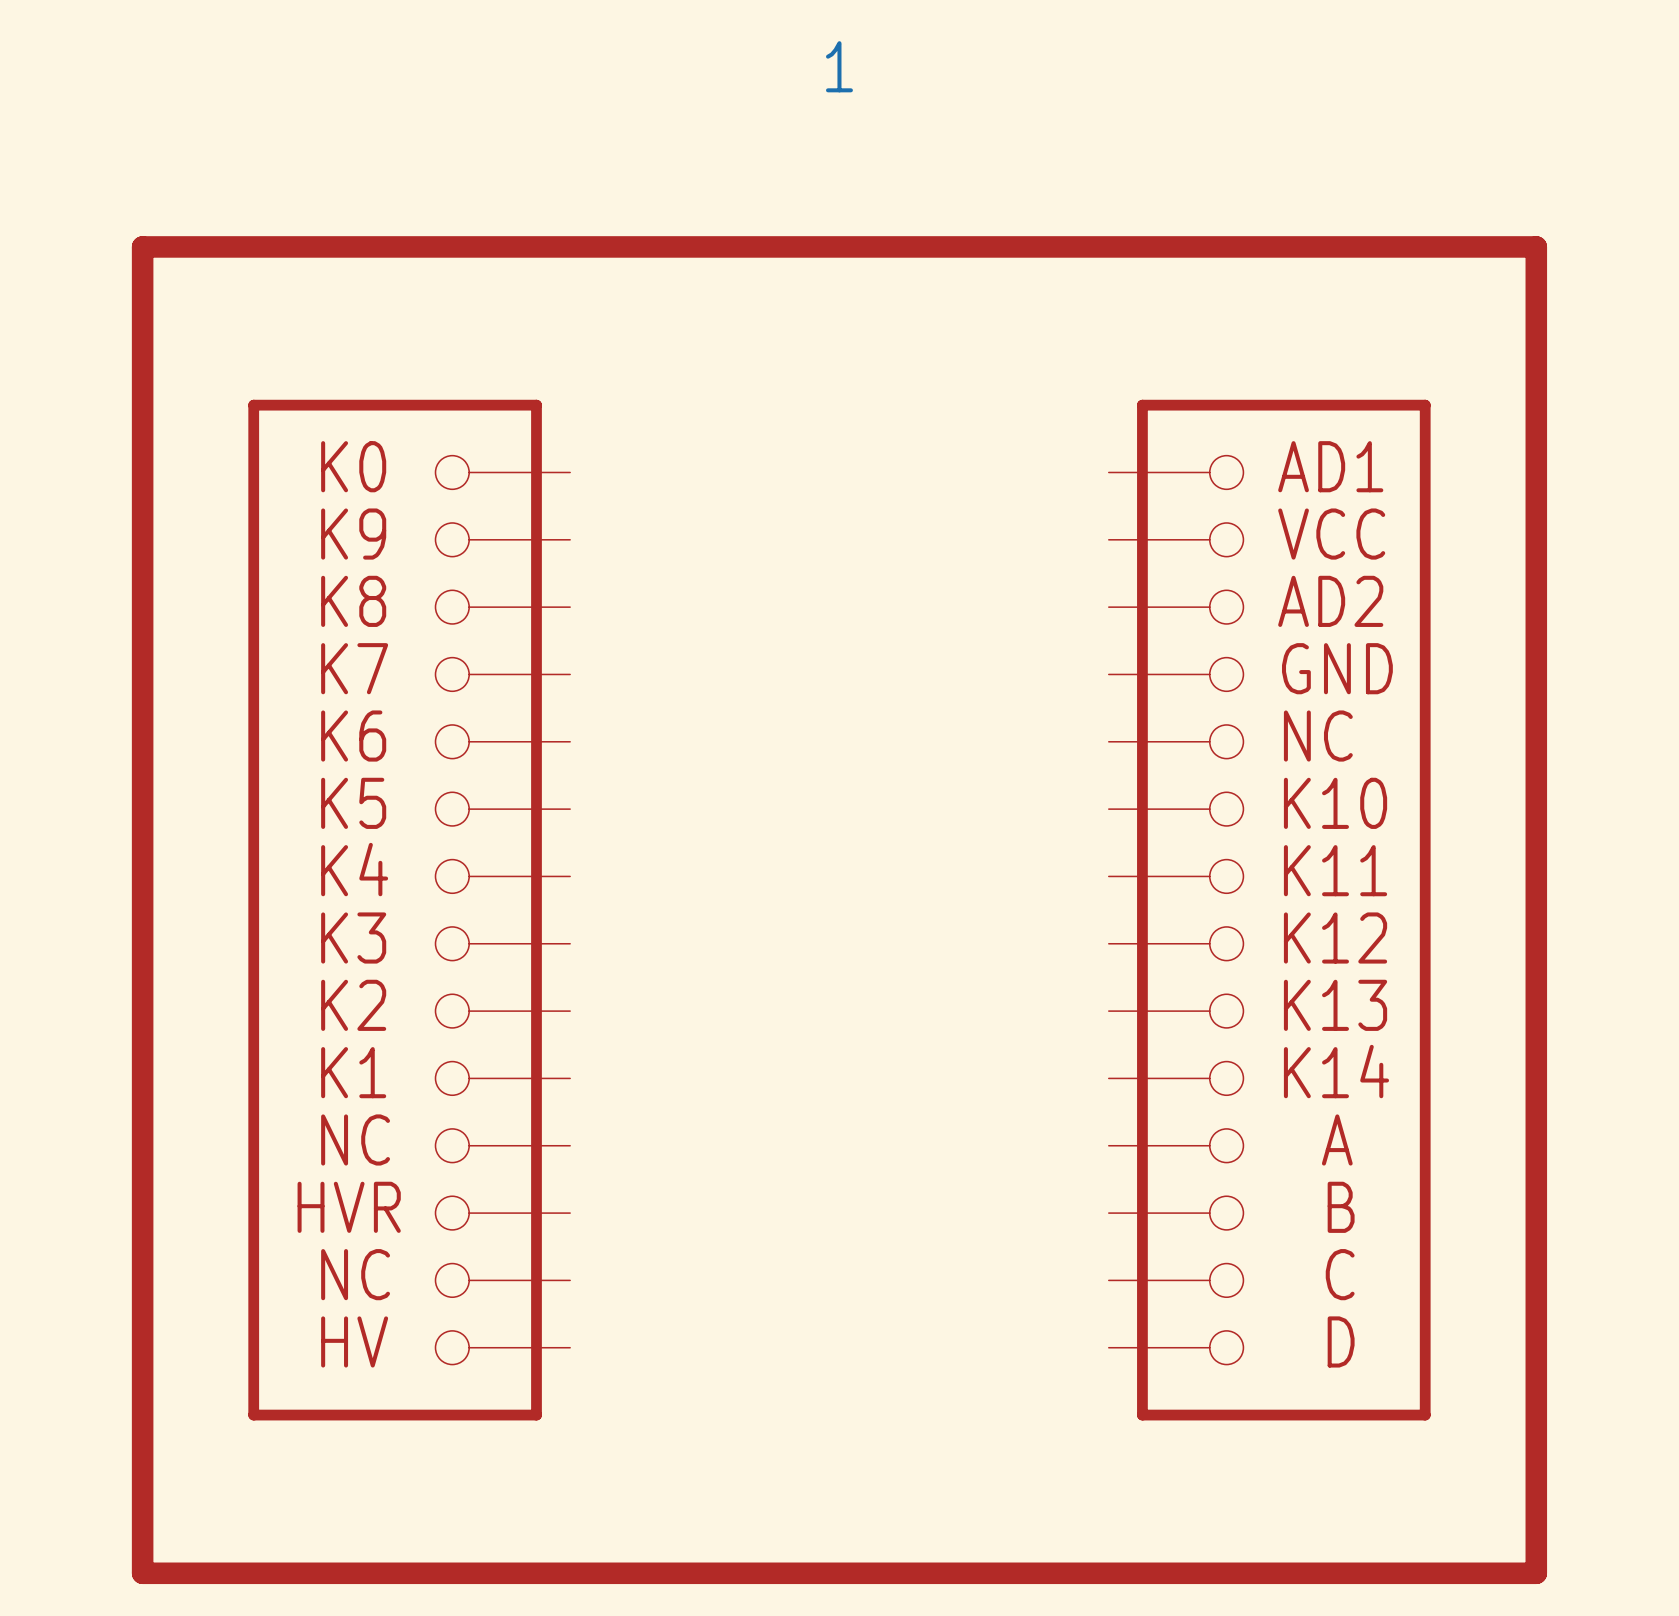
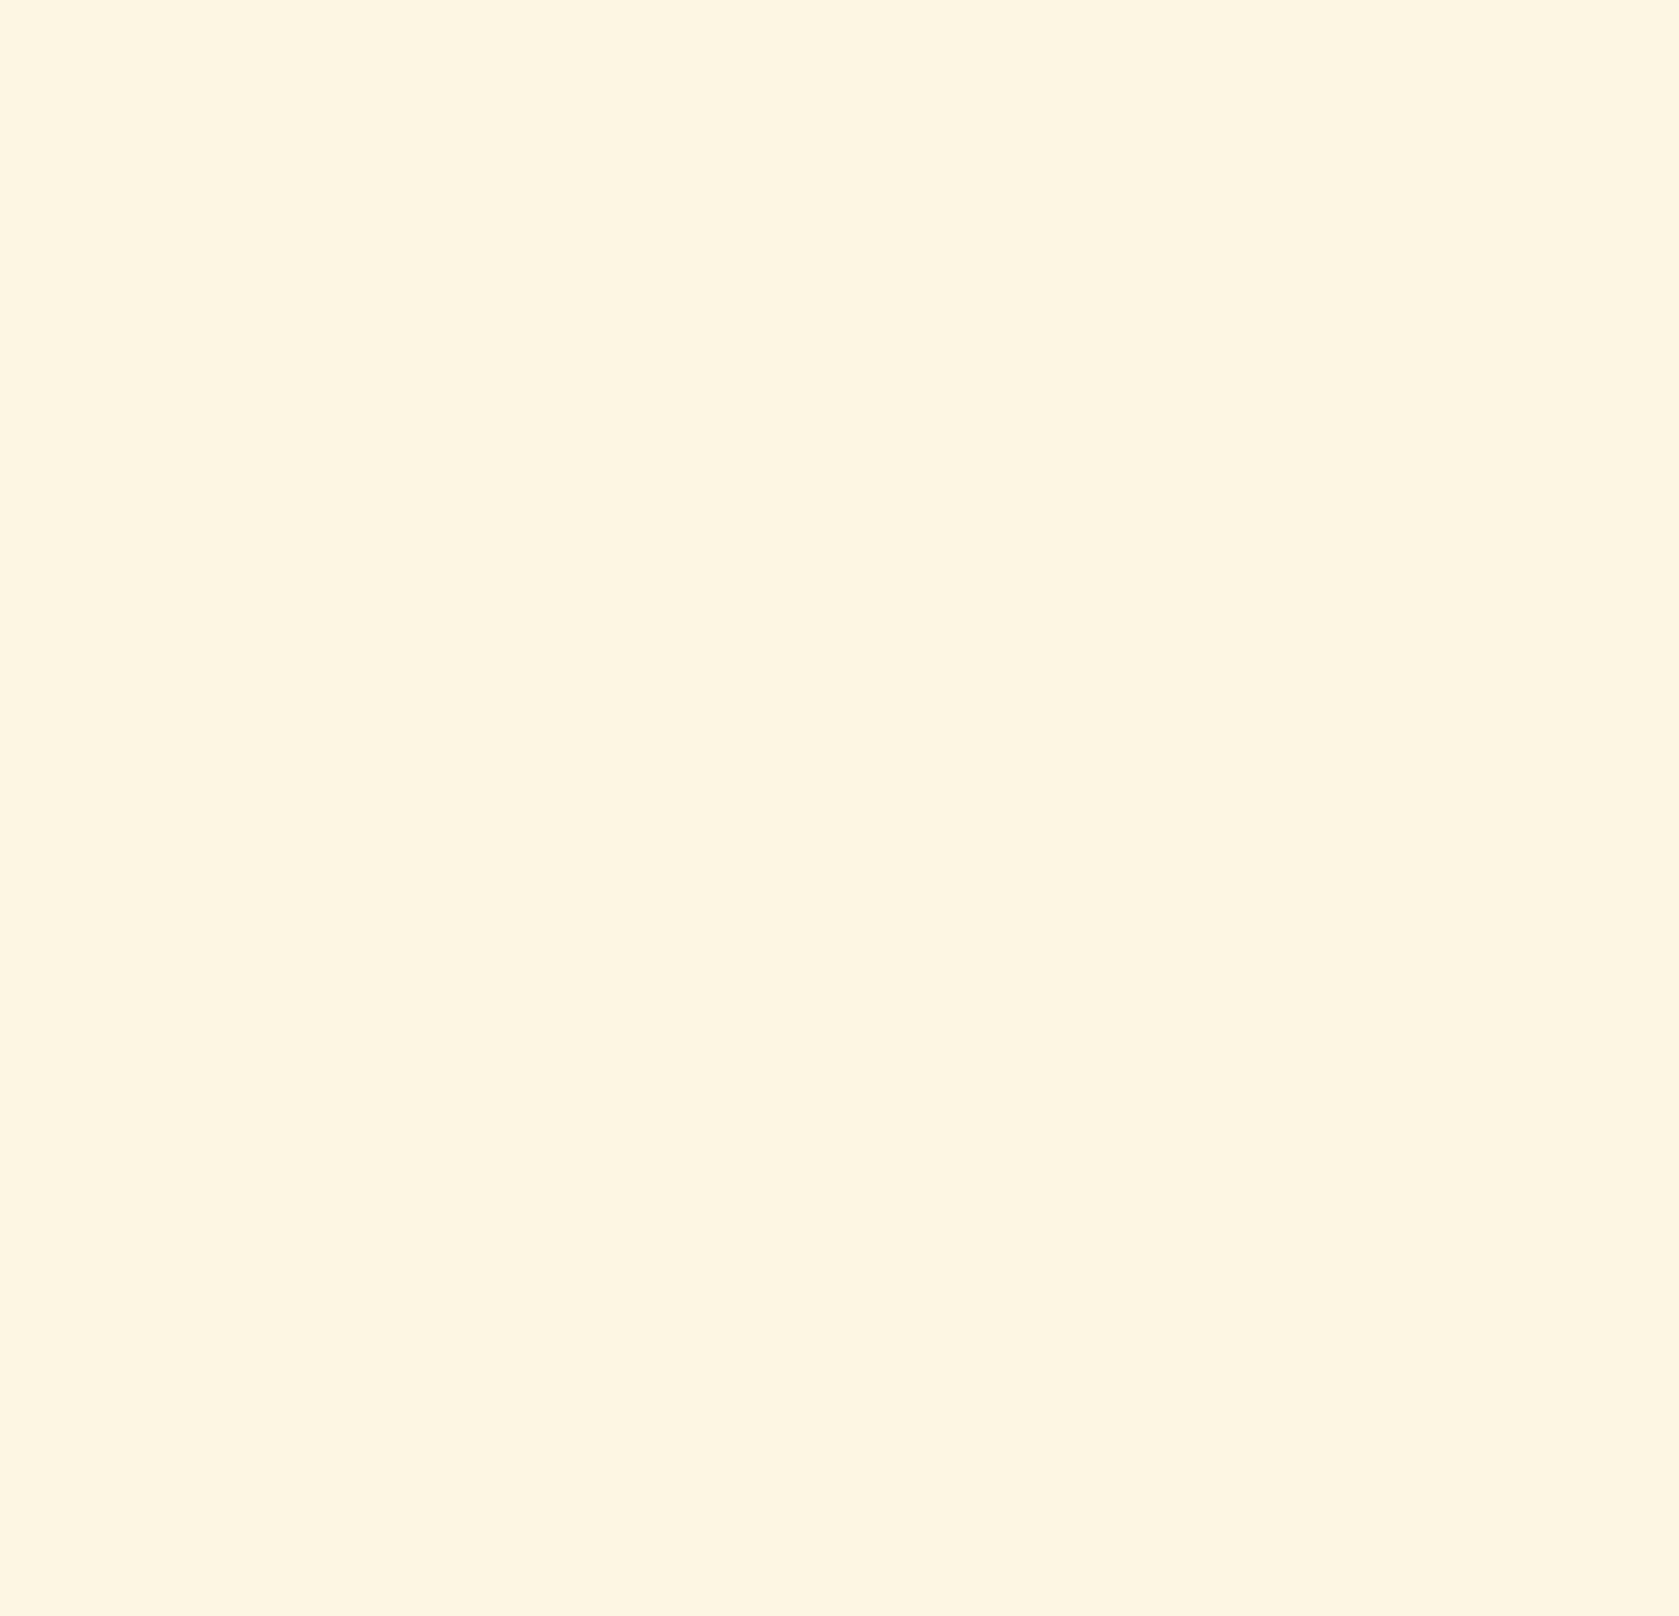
1: (839, 910) -> none

